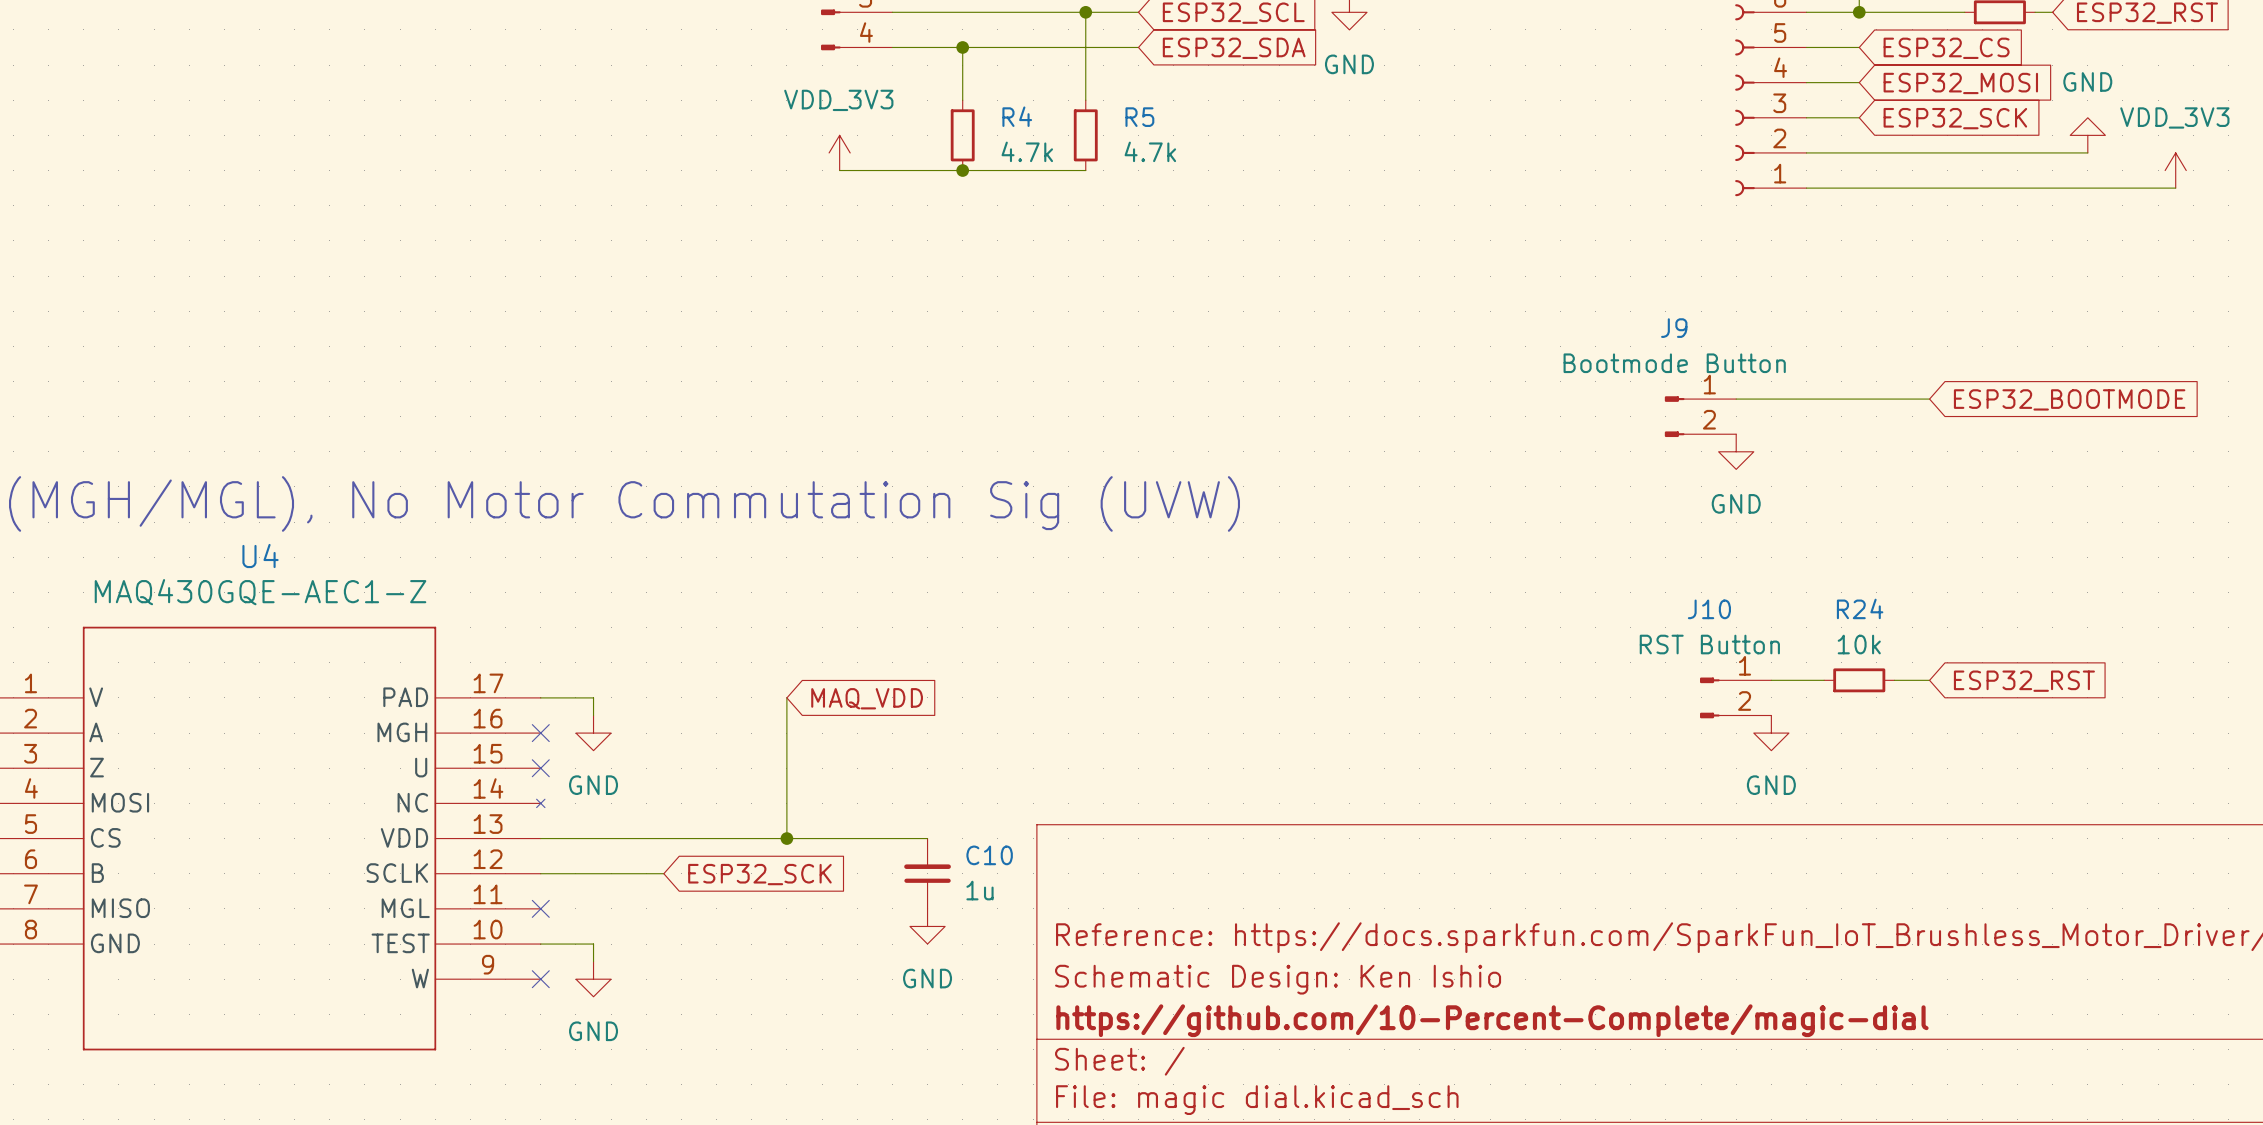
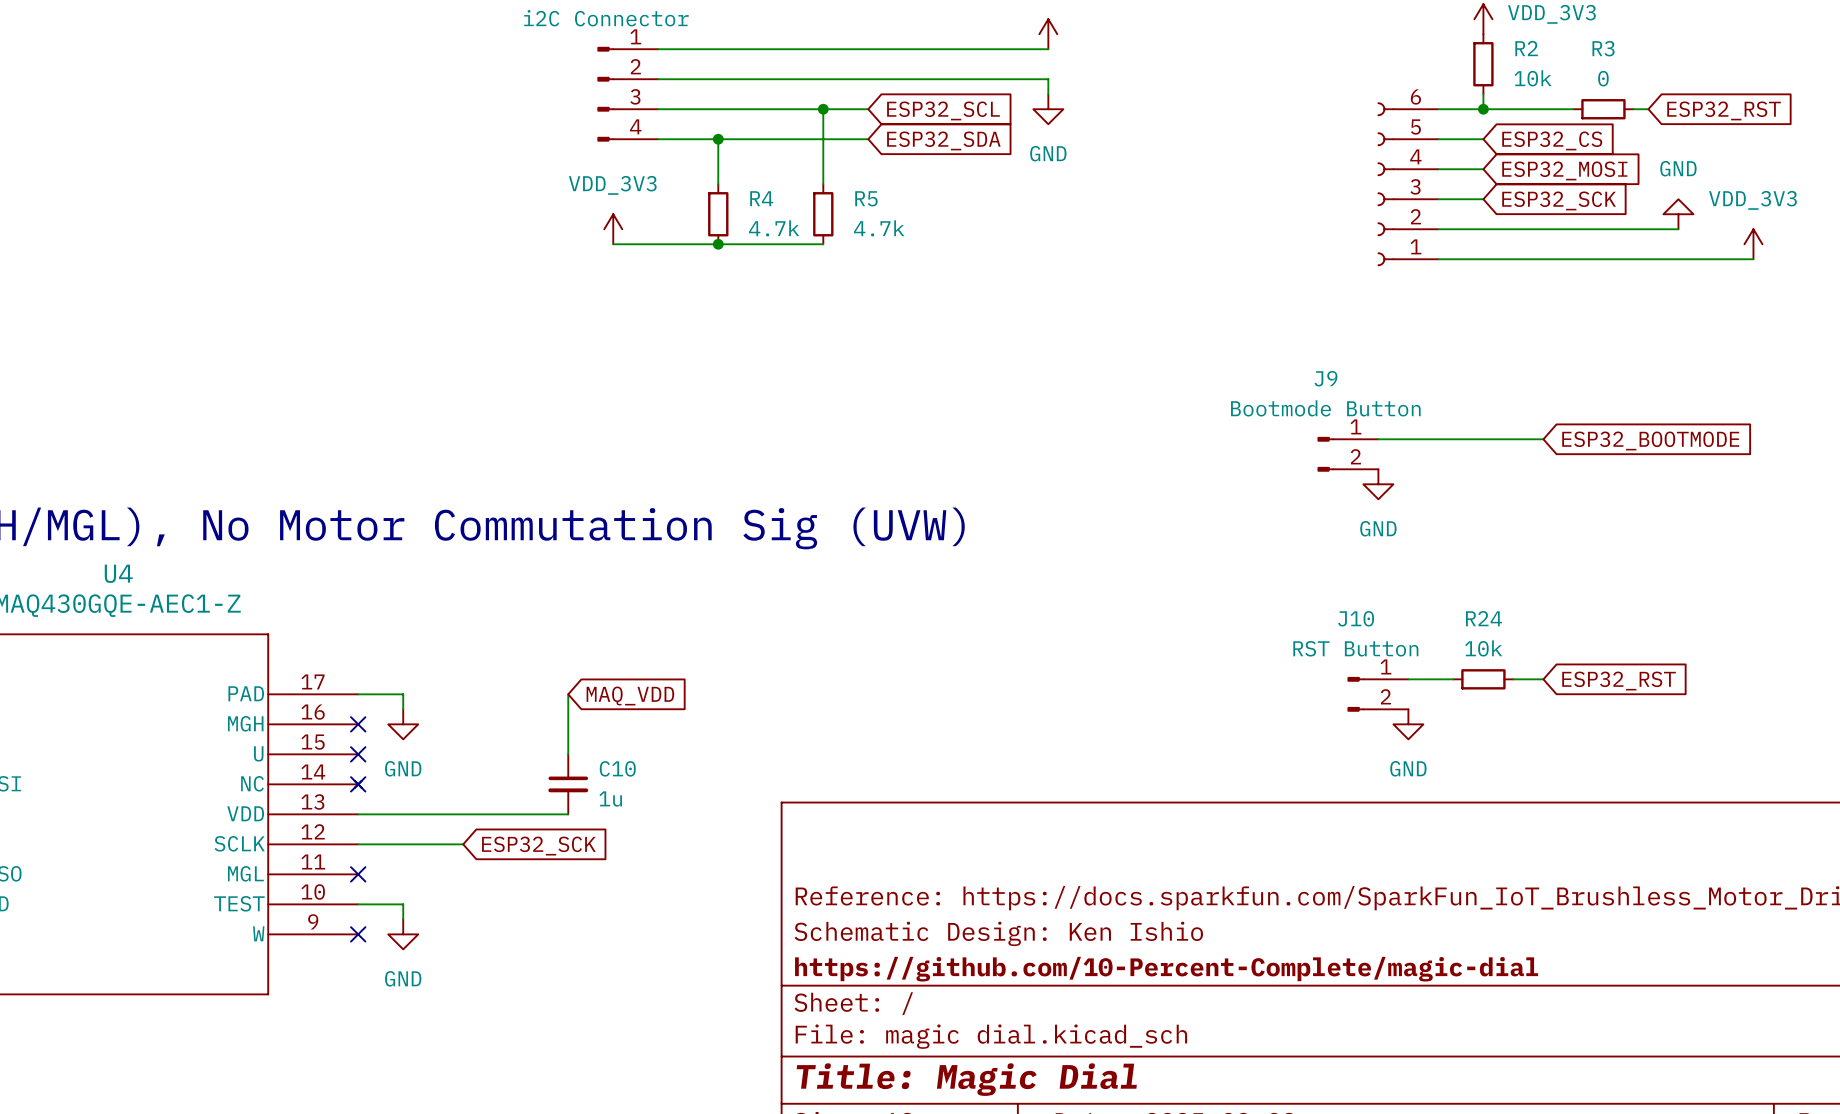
wire: (786, 768) (786, 838) (927, 838) -> none
no-connect mark: none -> (358, 784)
junction: (786, 838) -> none
C10 rotation: 0° (927, 873) -> 180° (568, 784)
C10 position: (927, 873) -> (568, 784)
power symbol: GND (927, 926) -> none

